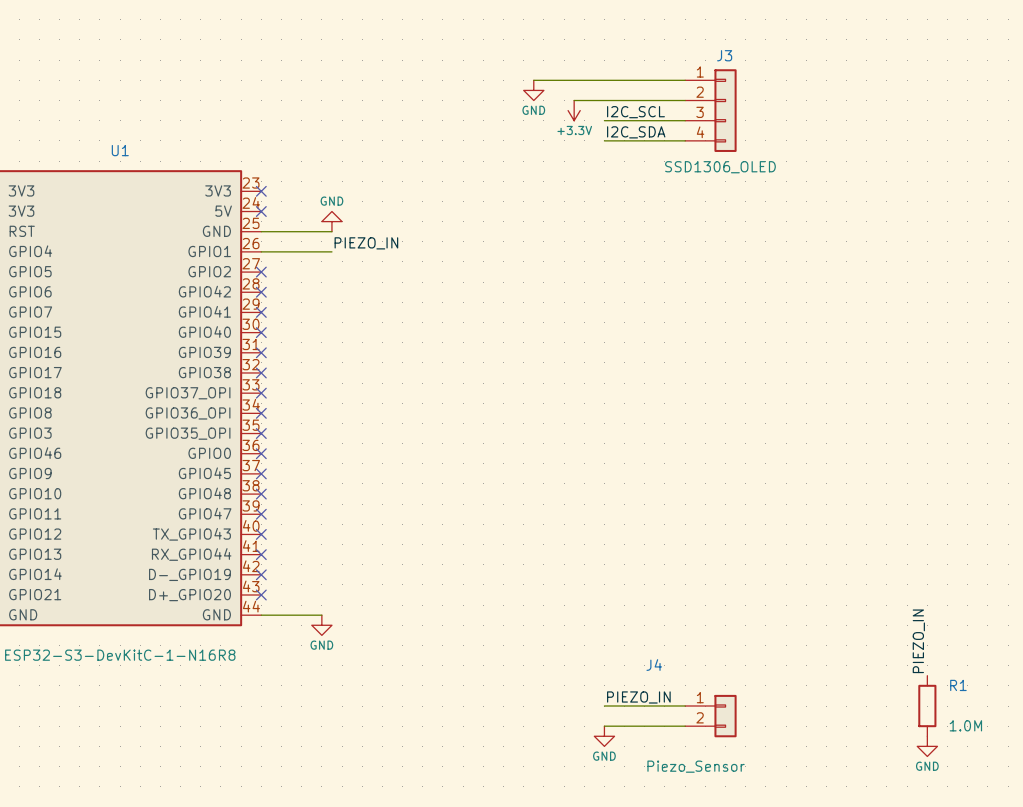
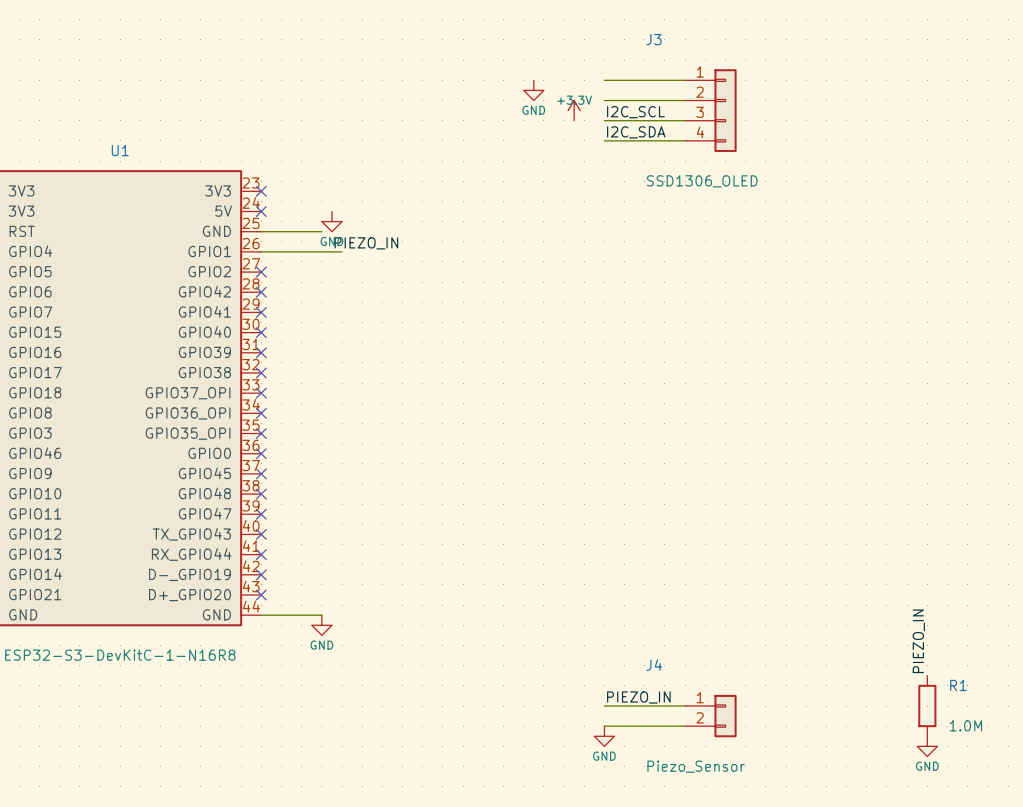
J3 name position: J3 (724, 55) -> J3 (654, 39)
wire: (533, 80) (604, 80) -> none
wire: (574, 100) (604, 100) -> none
power symbol rotation: 0° (574, 110) -> 180° (574, 110)
J3 value position: SSD1306_OLED (720, 167) -> SSD1306_OLED (702, 181)
power symbol rotation: 0° (331, 221) -> 180° (331, 221)
wire: (321, 231) (331, 231) -> (331, 251) (342, 251)

